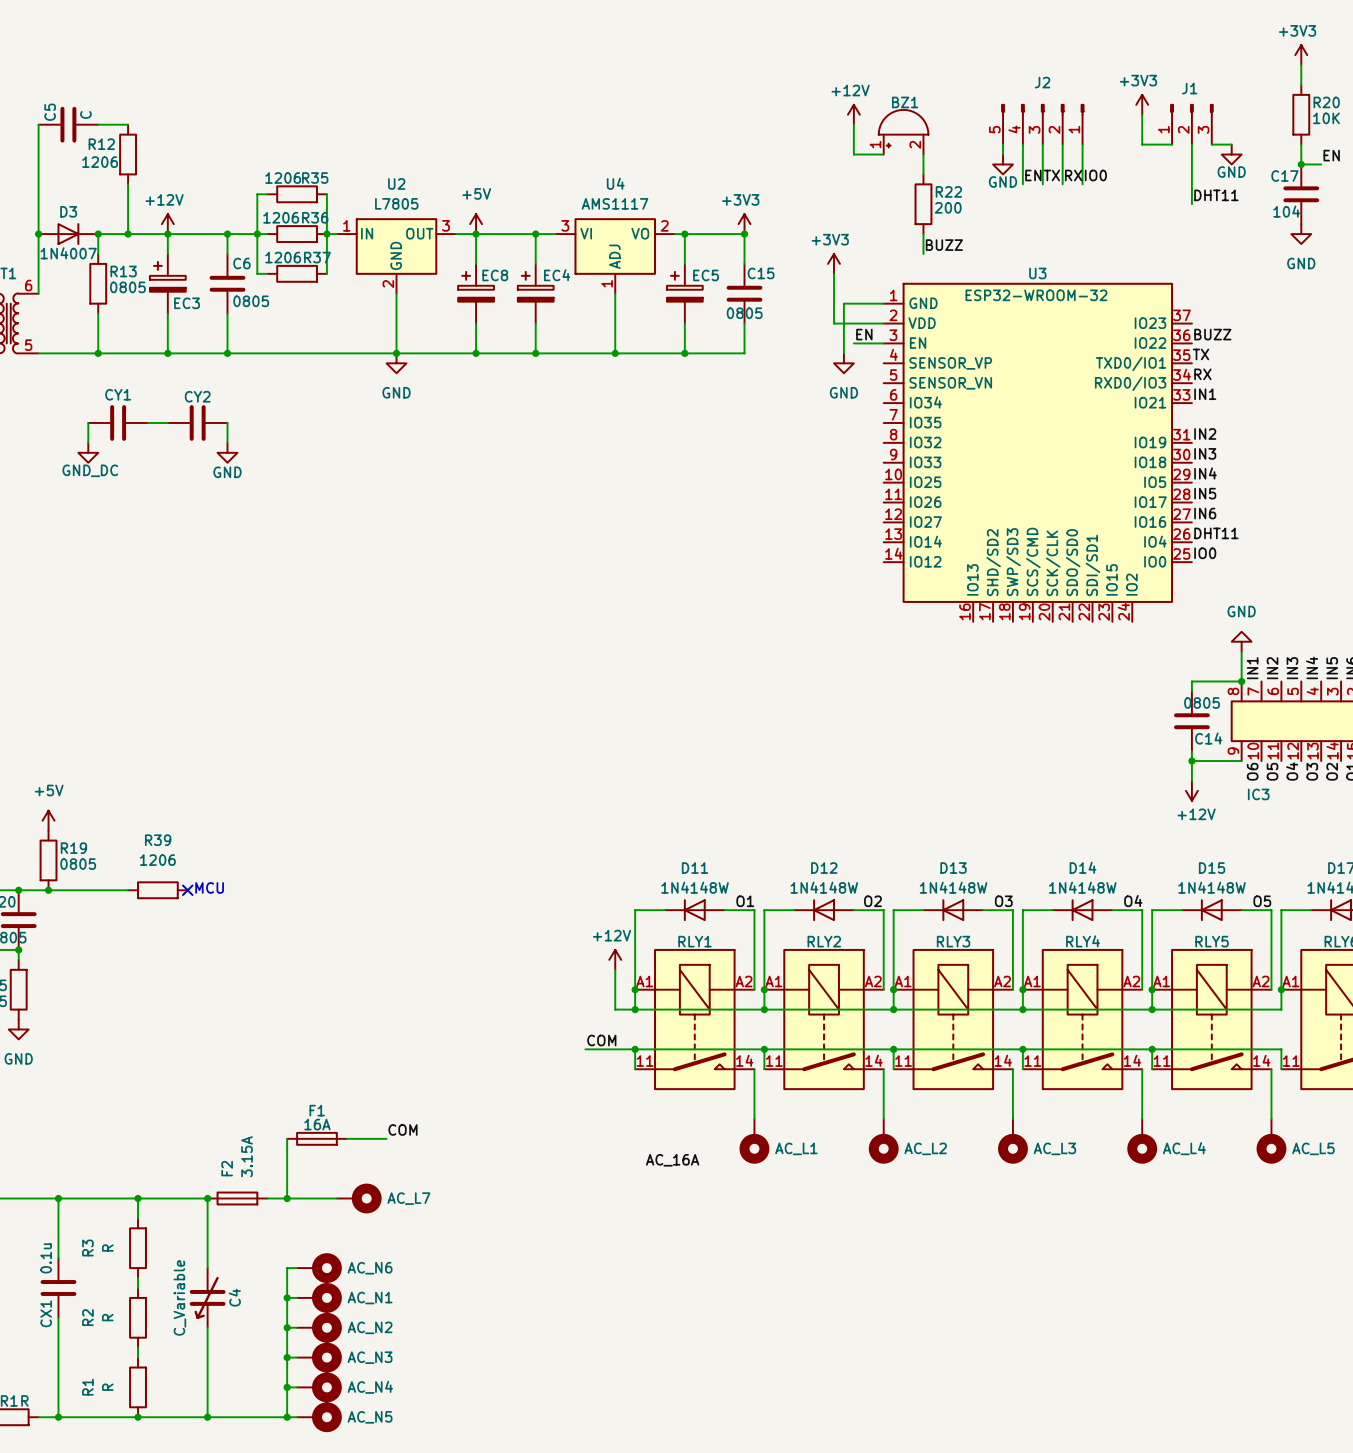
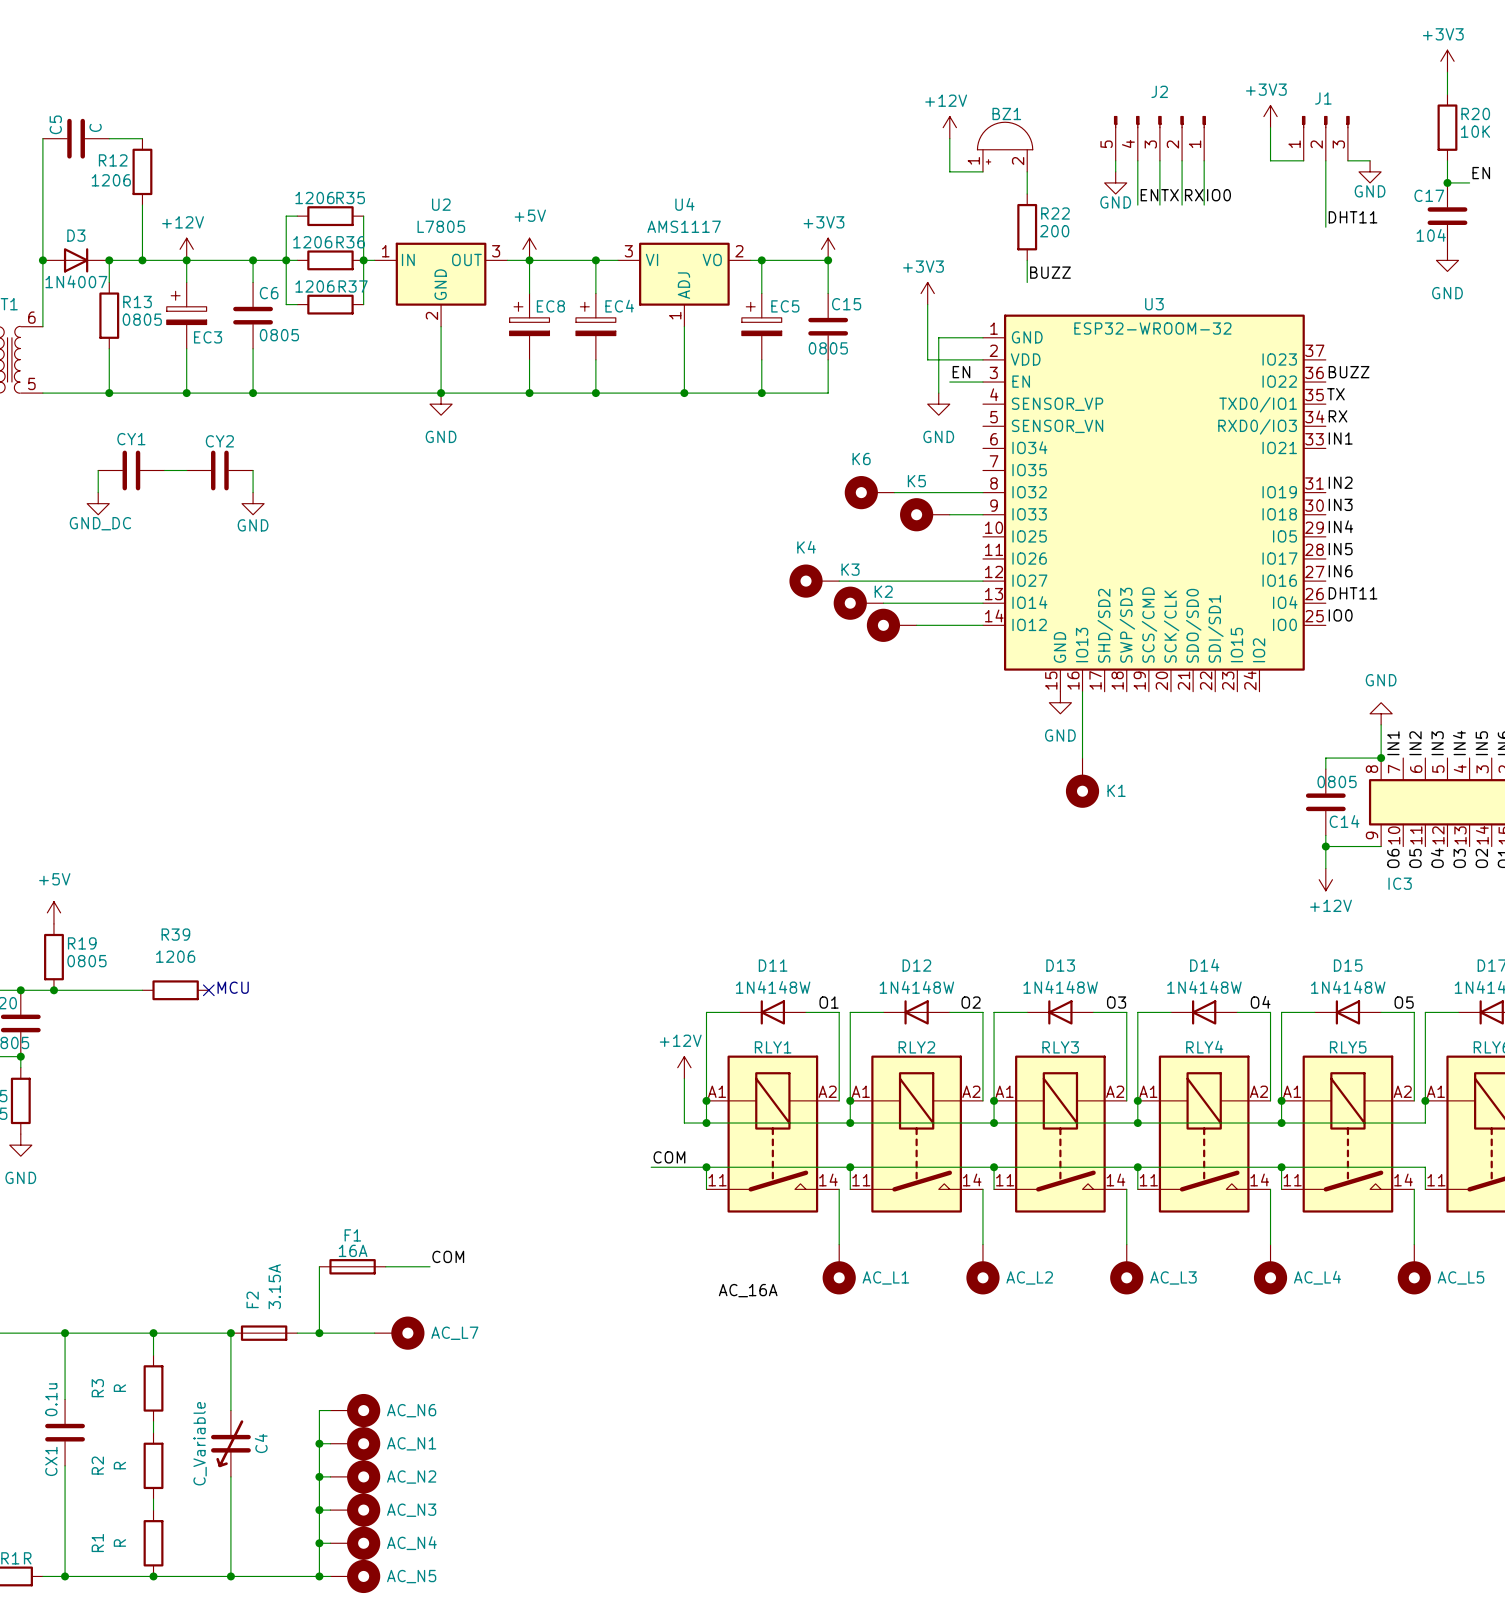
U3 symbol: [883, 282, 1192, 622] -> [982, 314, 1326, 692]
K6: none -> (869, 492)
wire: none -> (894, 492) (982, 492)
K5: none -> (924, 514)
wire: none -> (949, 514) (982, 514)
K4: none -> (814, 581)
wire: none -> (839, 581) (982, 581)
K3: none -> (858, 603)
wire: none -> (883, 603) (982, 603)
K2: none -> (891, 625)
wire: none -> (916, 625) (982, 625)
wire: none -> (1082, 691) (1082, 758)
power symbol: none -> GND (1060, 702)
K1: none -> (1082, 782)

